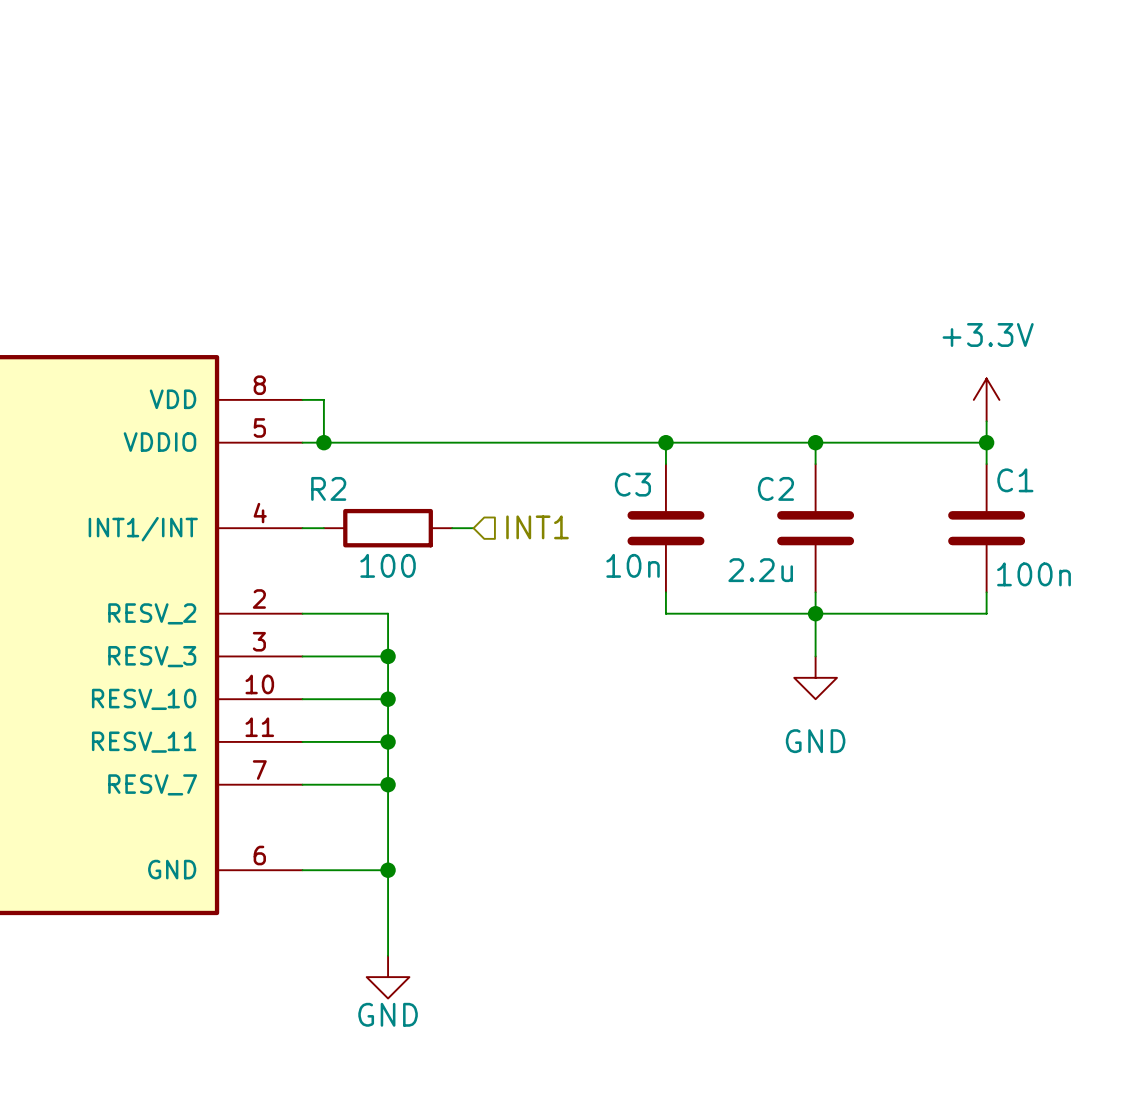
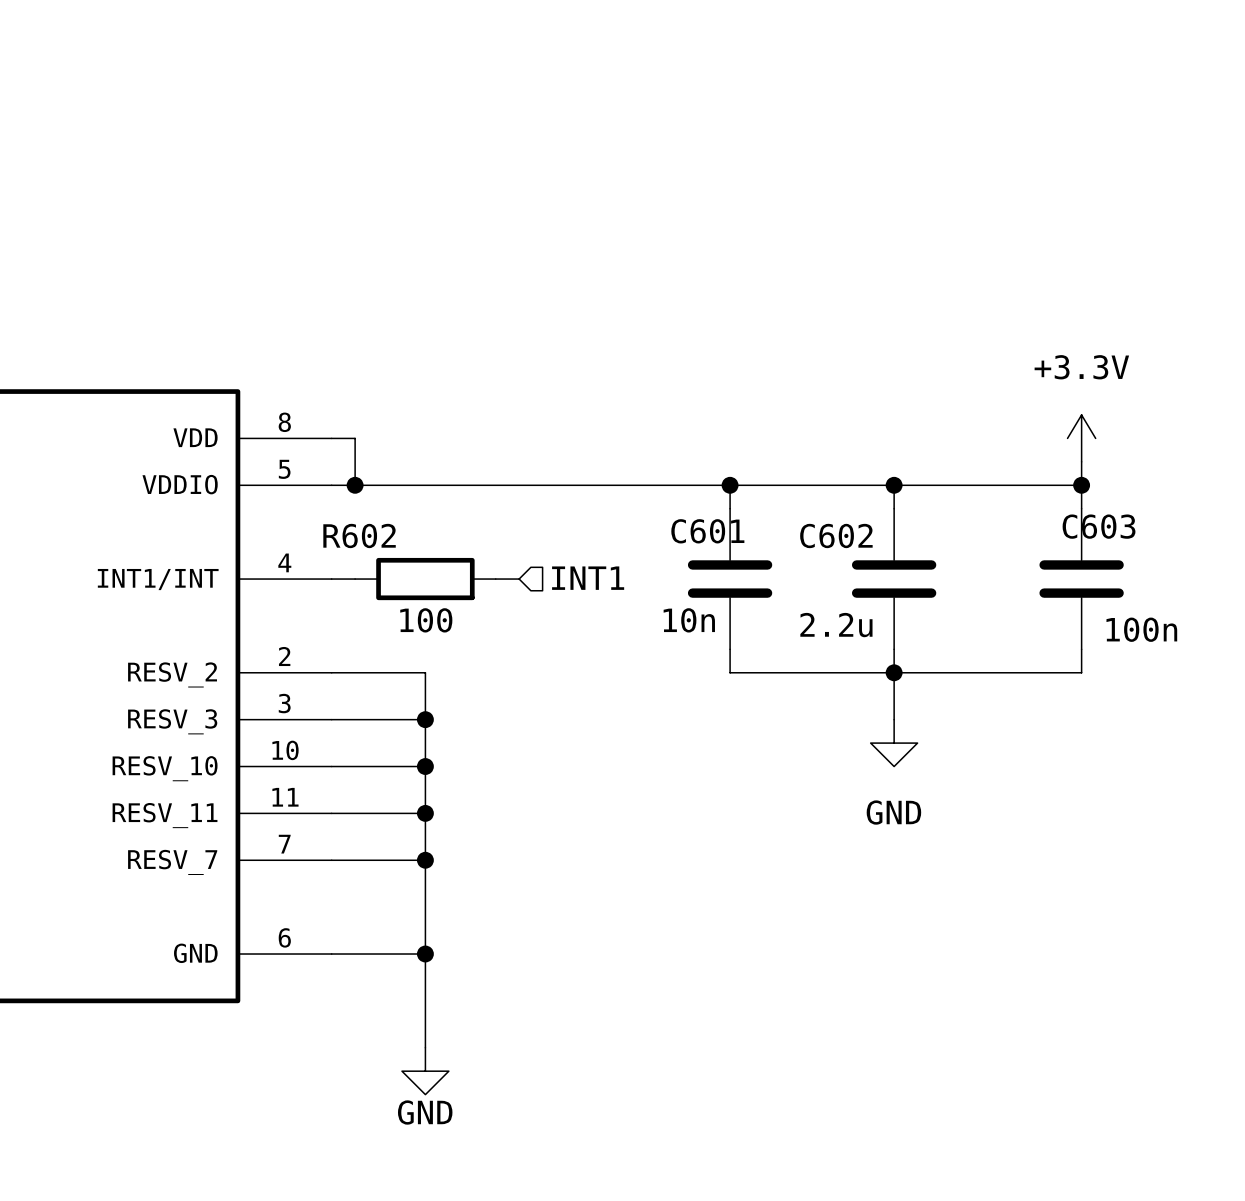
C1 name: C1 (1015, 480) -> C603 (1099, 526)
C3 name: C3 (632, 484) -> C601 (707, 531)
R2 name: R2 (328, 488) -> R602 (359, 535)
C2 name: C2 (775, 488) -> C602 (836, 535)

